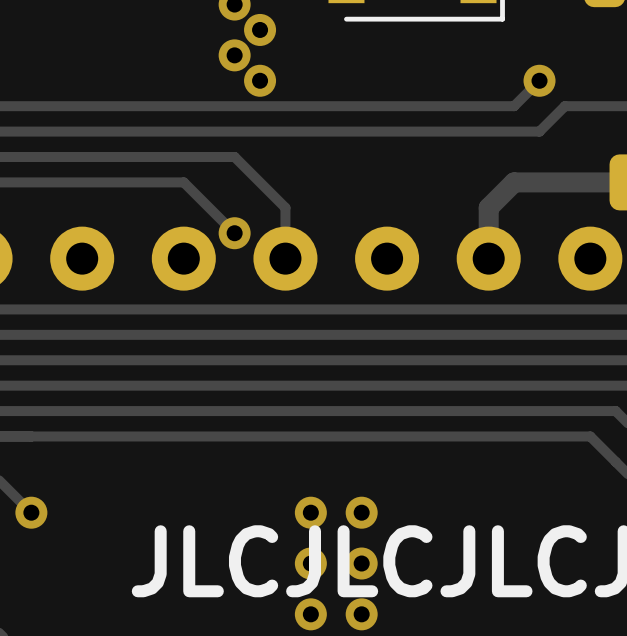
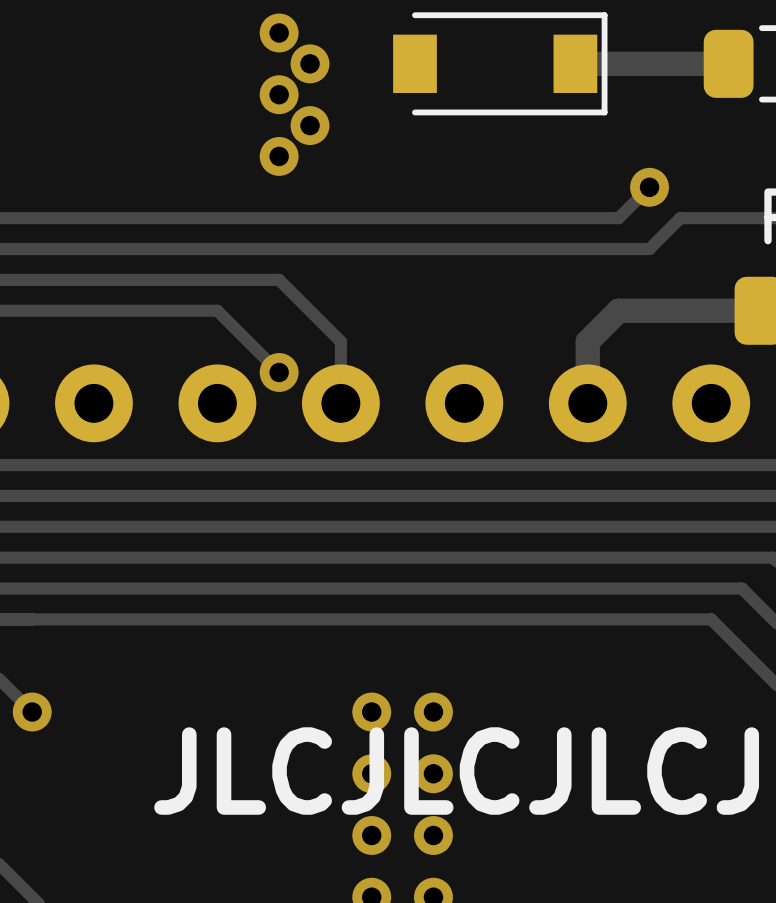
via: (260, 80) -> none

